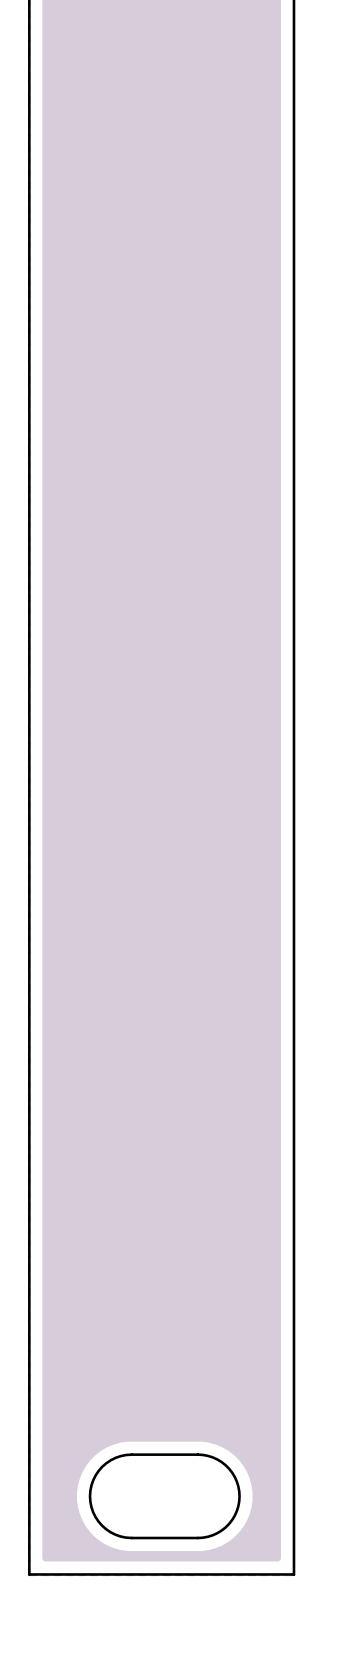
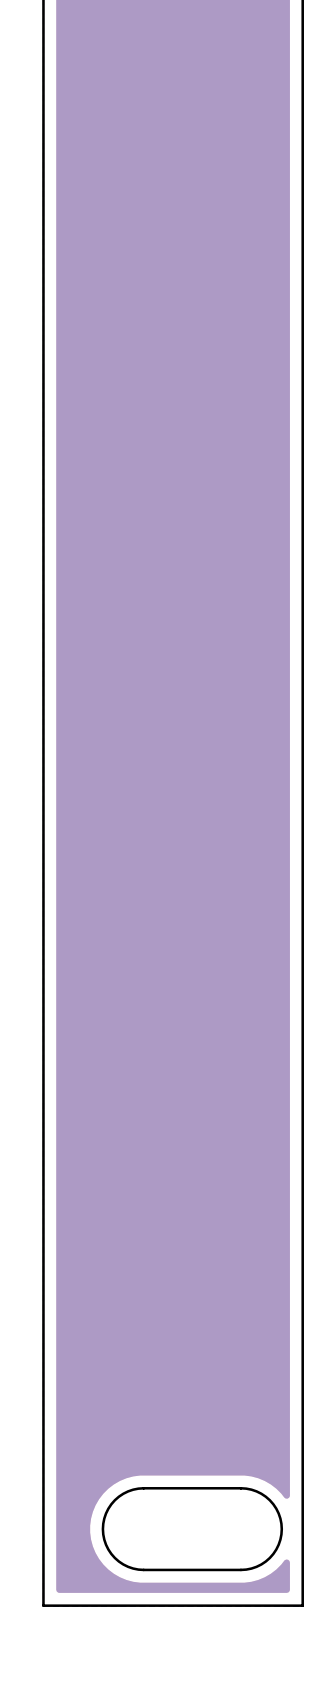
board edge: (197, 1454) (212, 1457) (229, 1468) (236, 1481) (239, 1496) (236, 1511) (229, 1523) (212, 1535) (197, 1538) -> (208, 1488) (246, 1488) (261, 1493) (276, 1508) (281, 1529) (276, 1549) (261, 1564) (246, 1569) (208, 1569)

